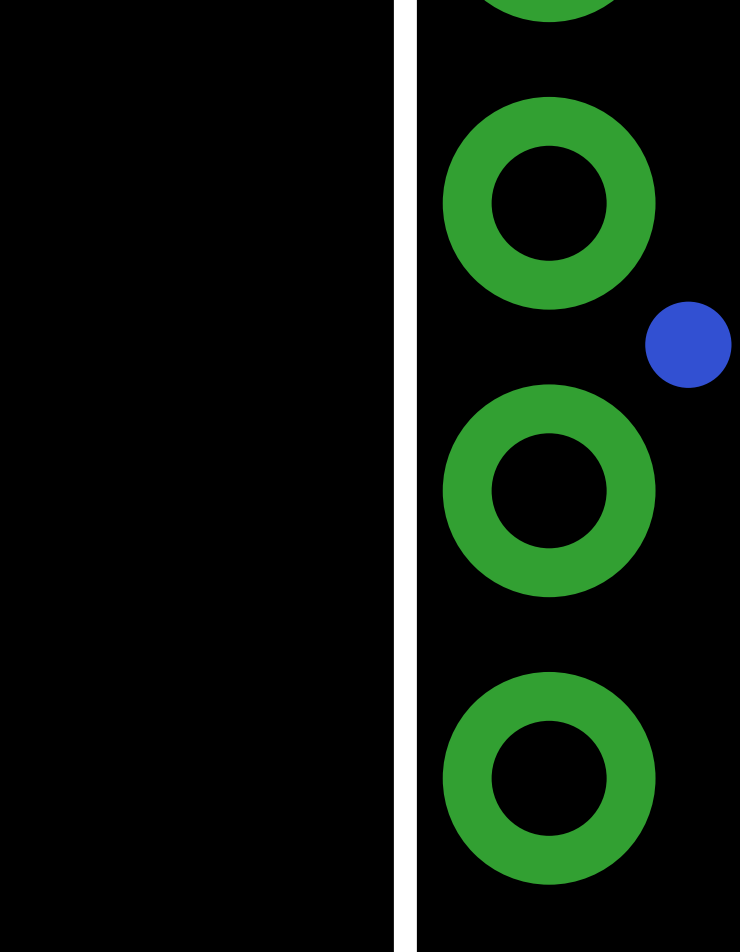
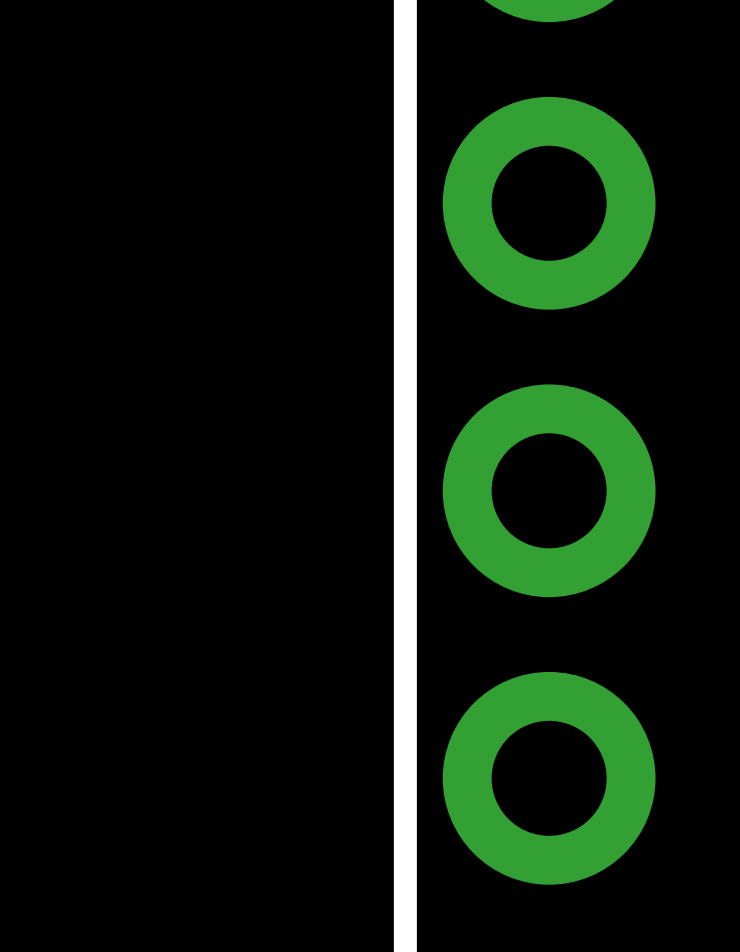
part: (688, 344) -> none

